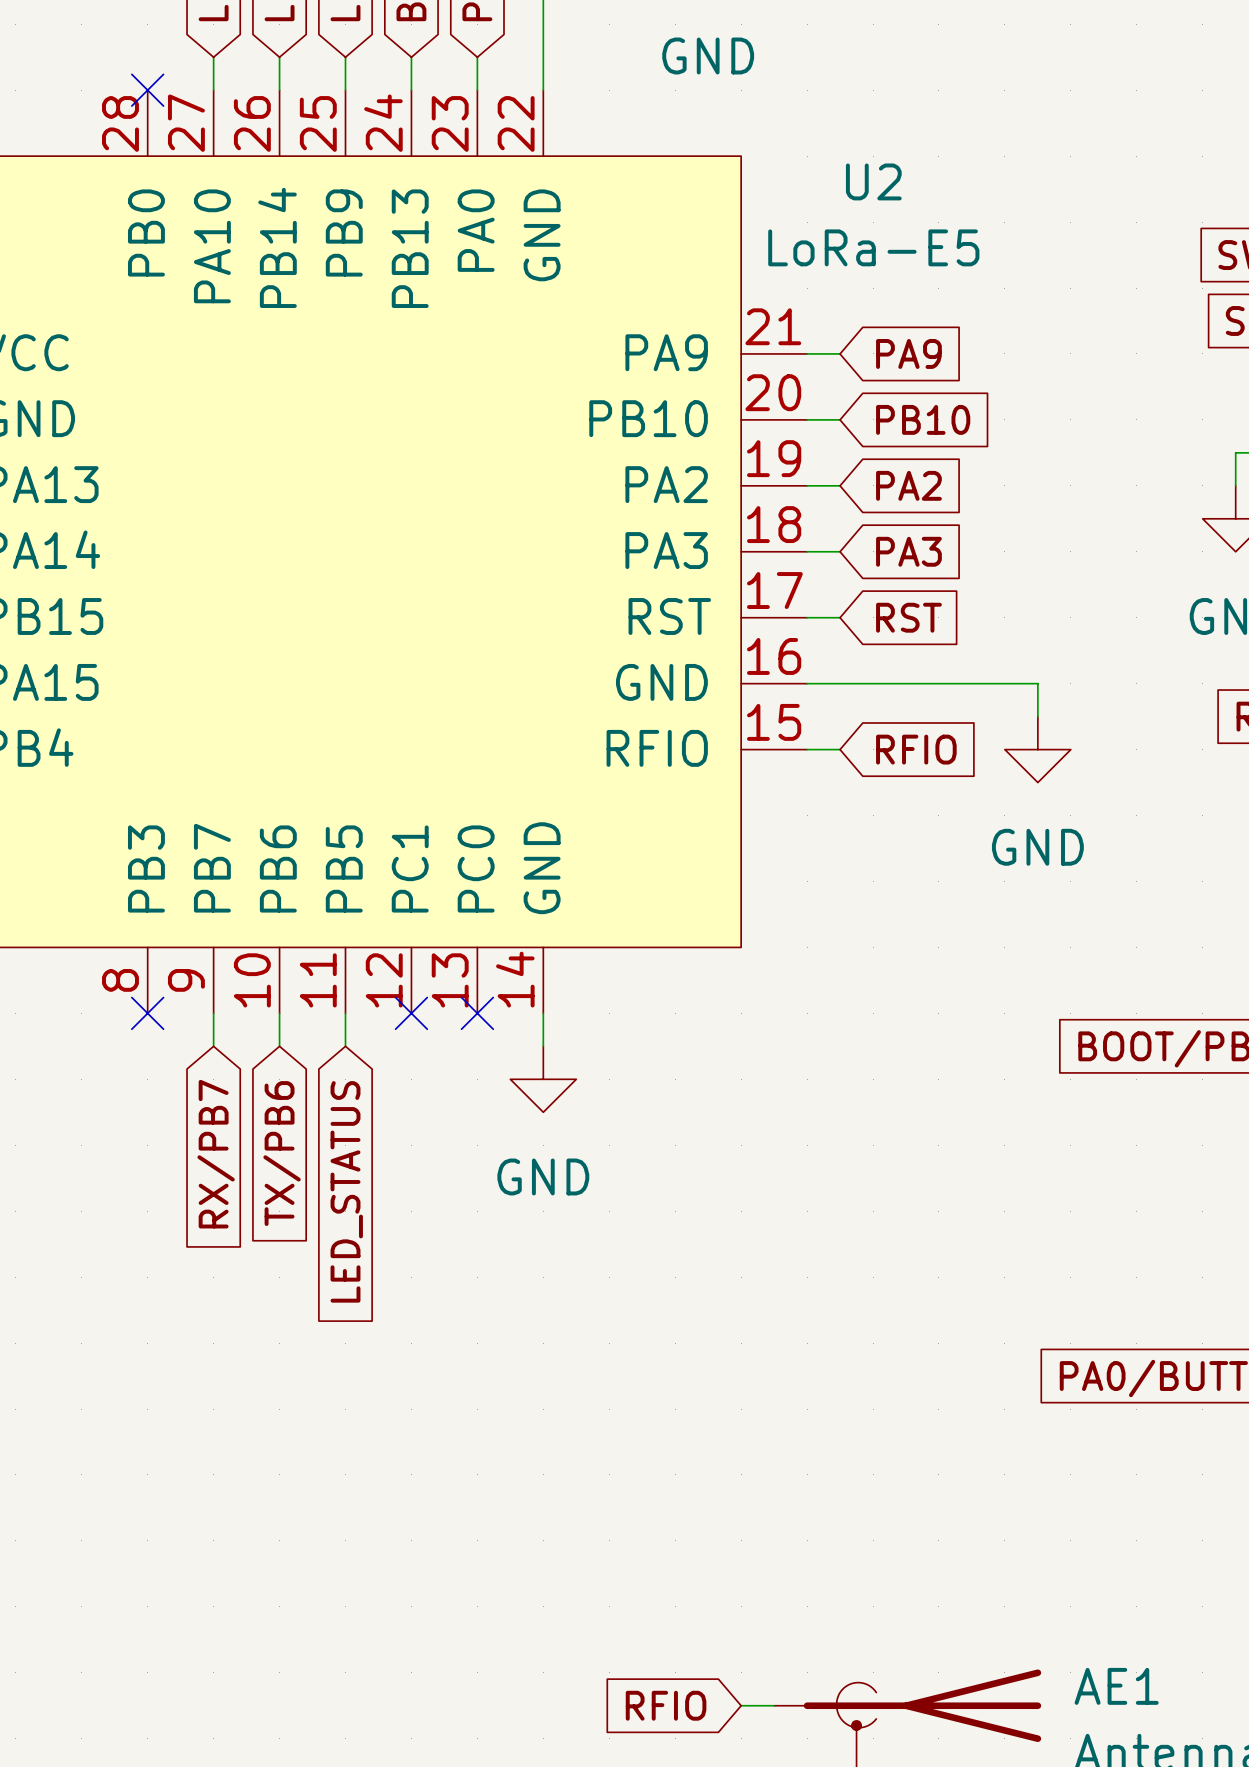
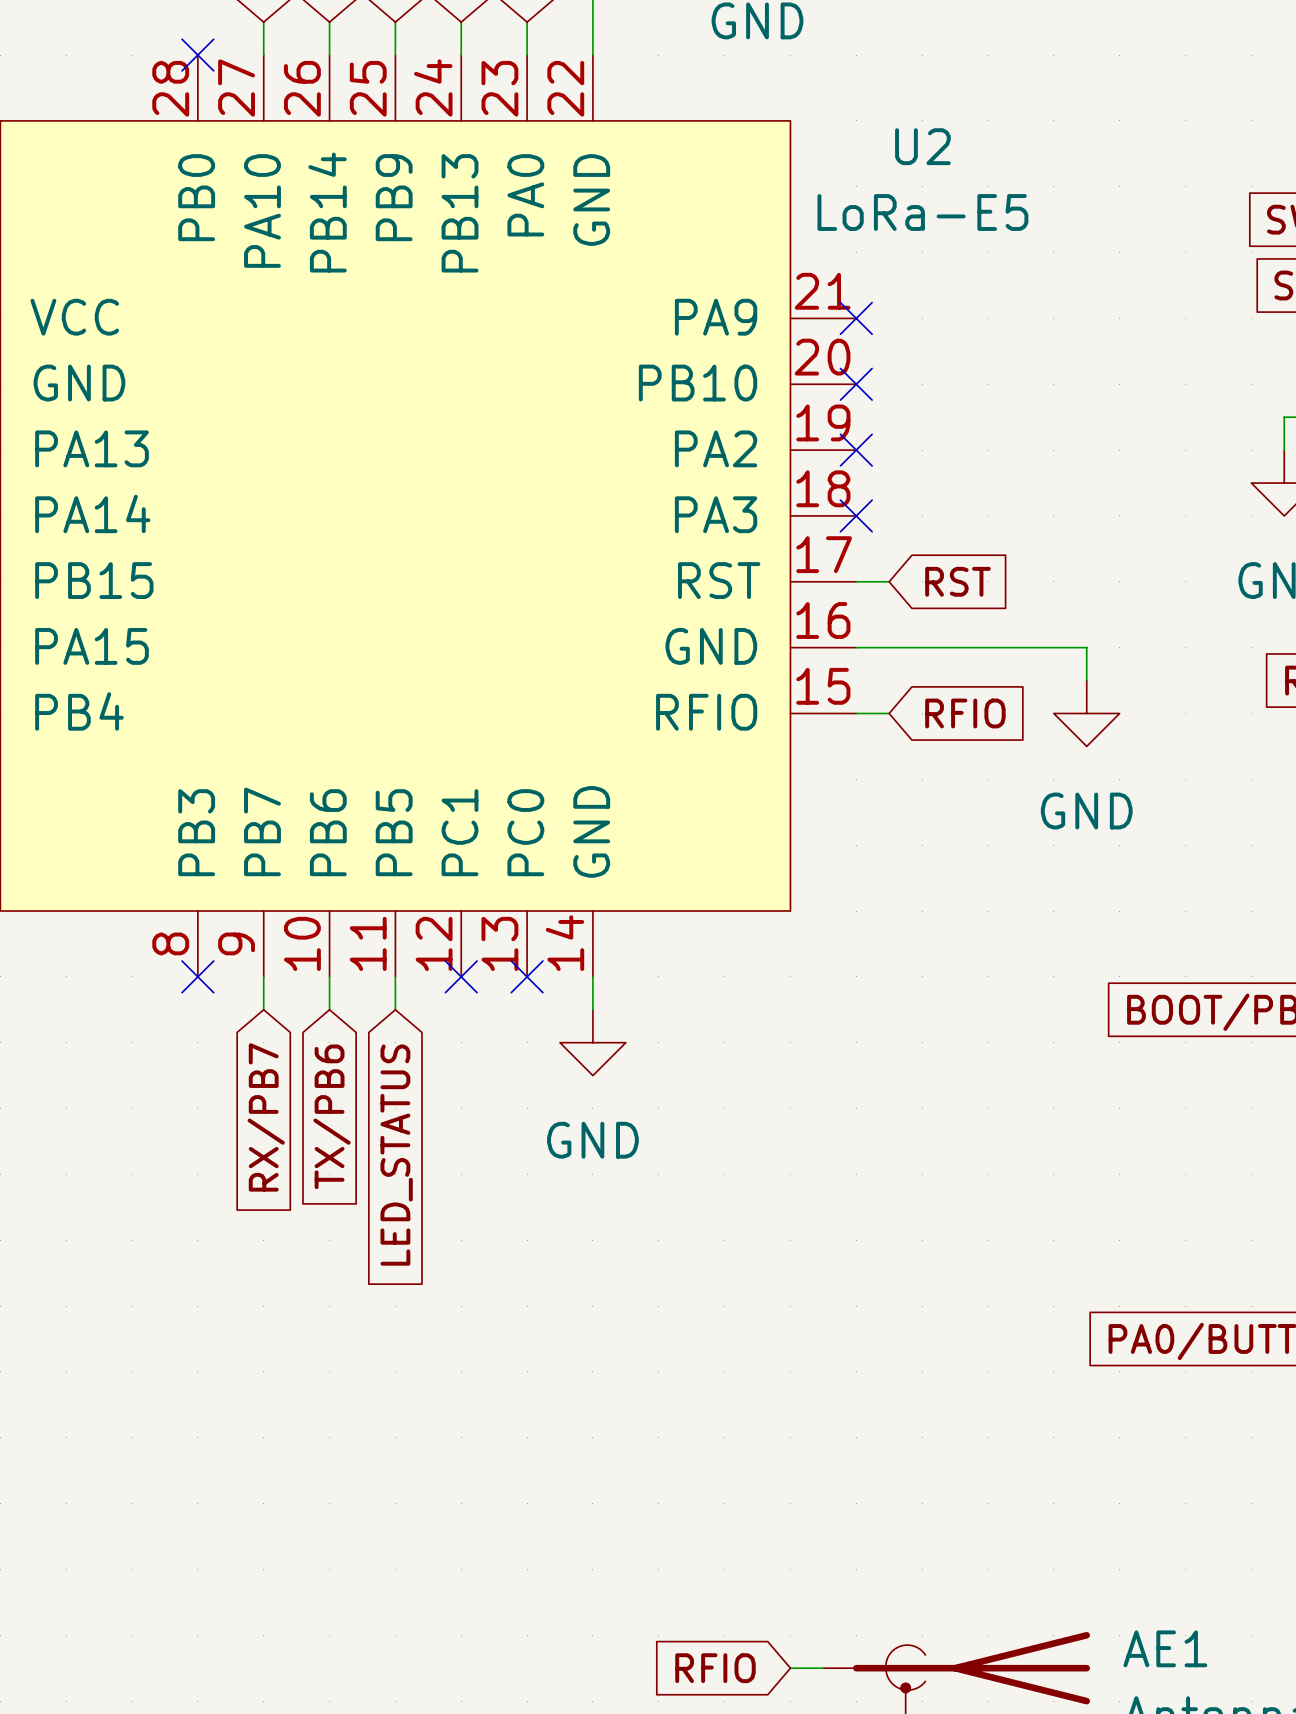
wire: (807, 353) (840, 353) -> none
no-connect mark: none -> (856, 318)
global label: PA9 (908, 353) -> none
wire: (807, 419) (840, 419) -> none
no-connect mark: none -> (856, 384)
global label: PB10 (923, 419) -> none
wire: (807, 485) (840, 485) -> none
no-connect mark: none -> (856, 450)
global label: PA2 (908, 485) -> none
wire: (807, 551) (840, 551) -> none
no-connect mark: none -> (856, 515)
global label: PA3 (908, 551) -> none

